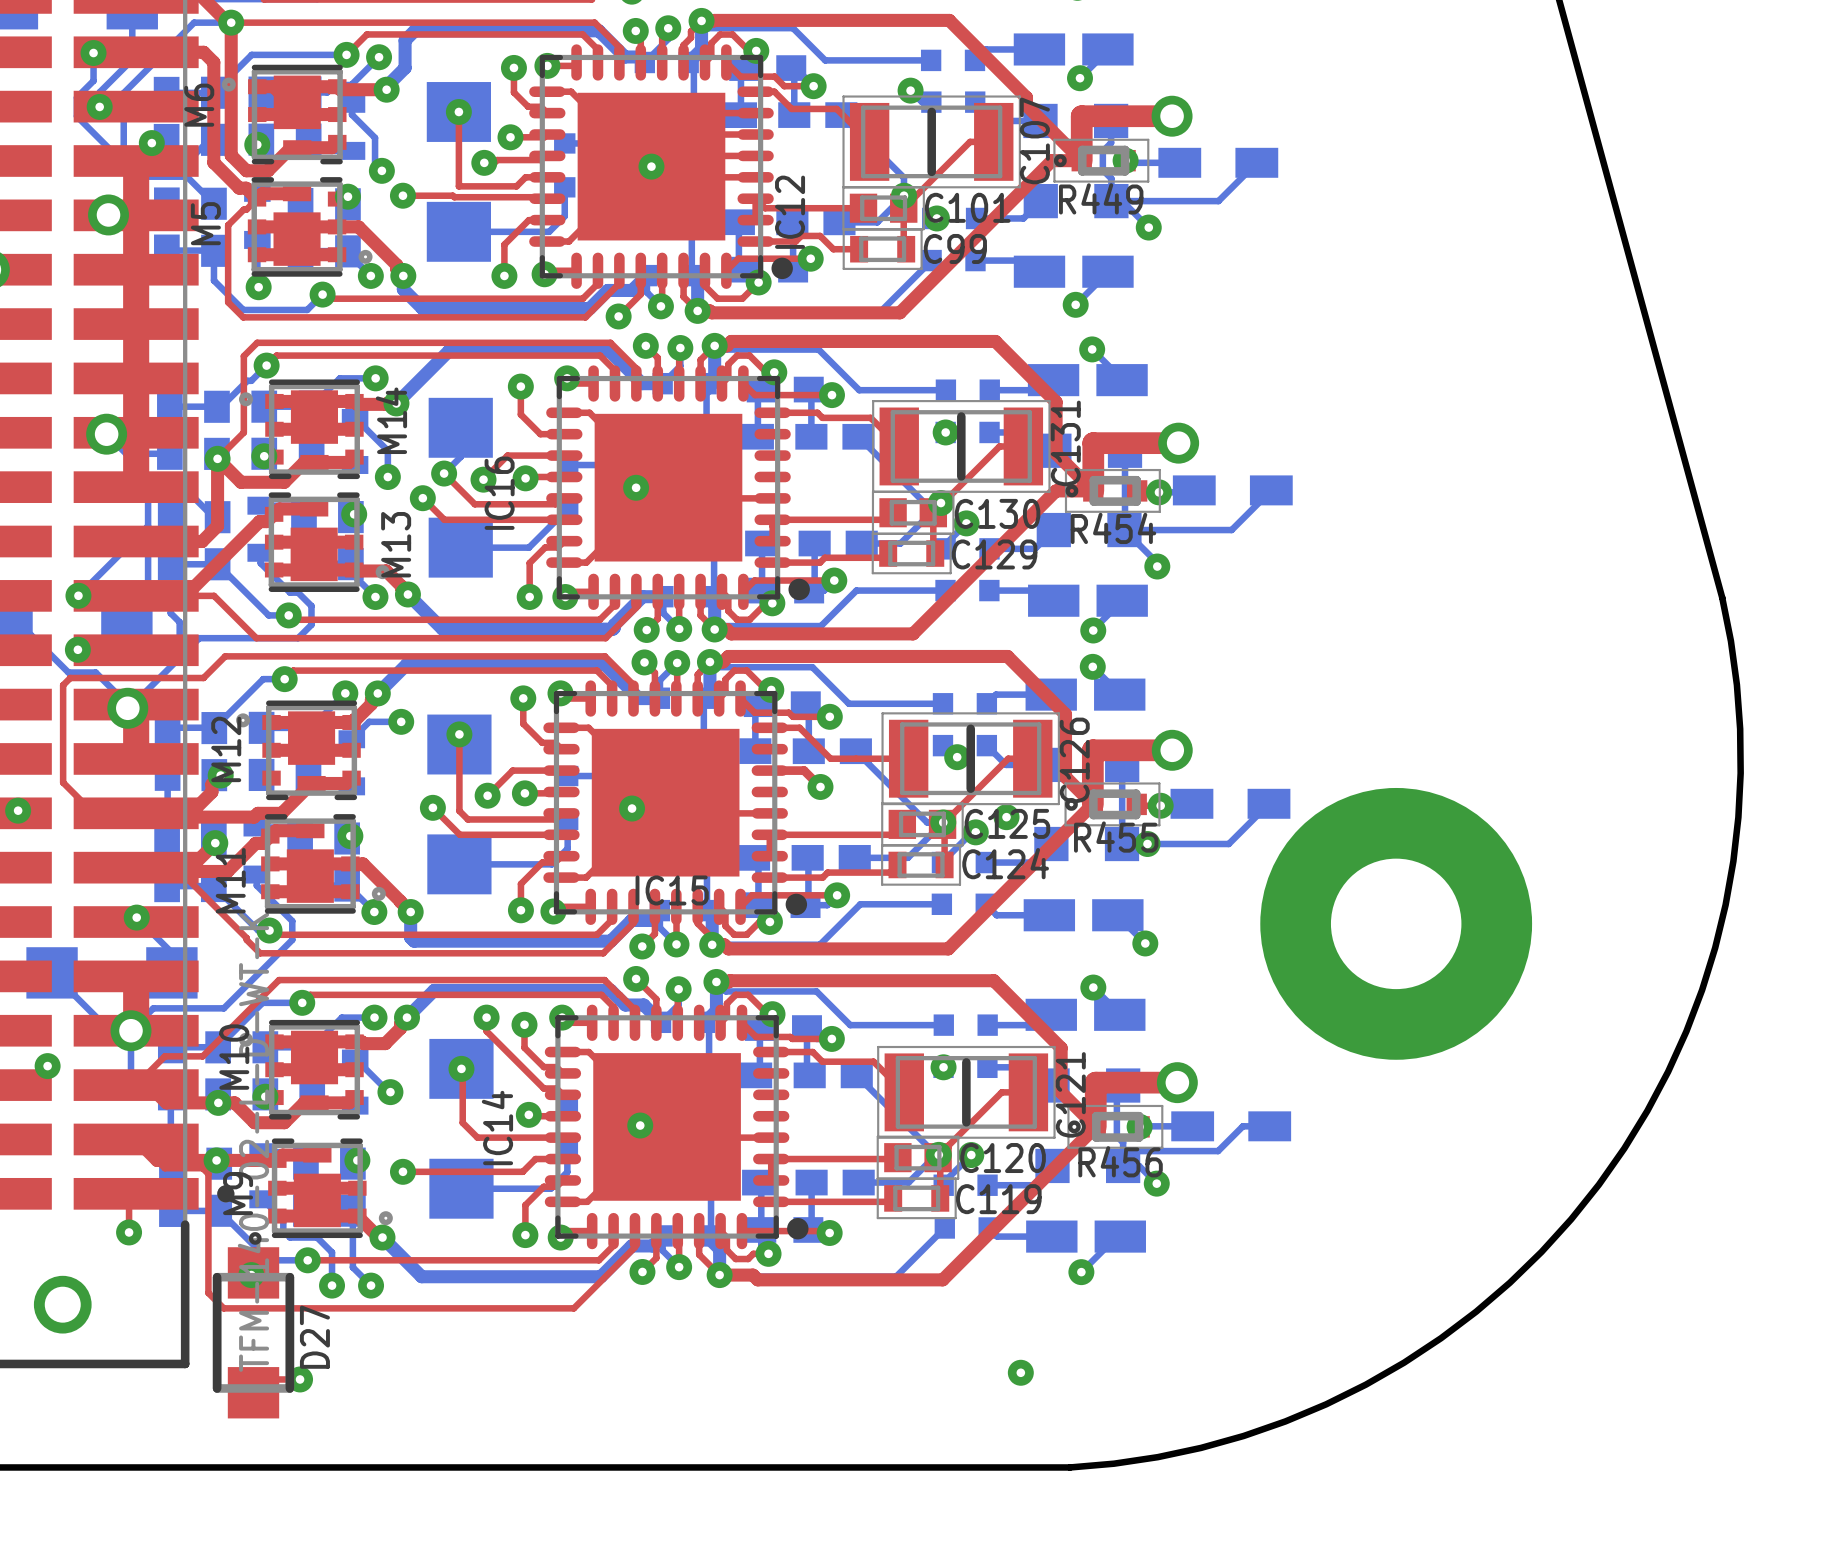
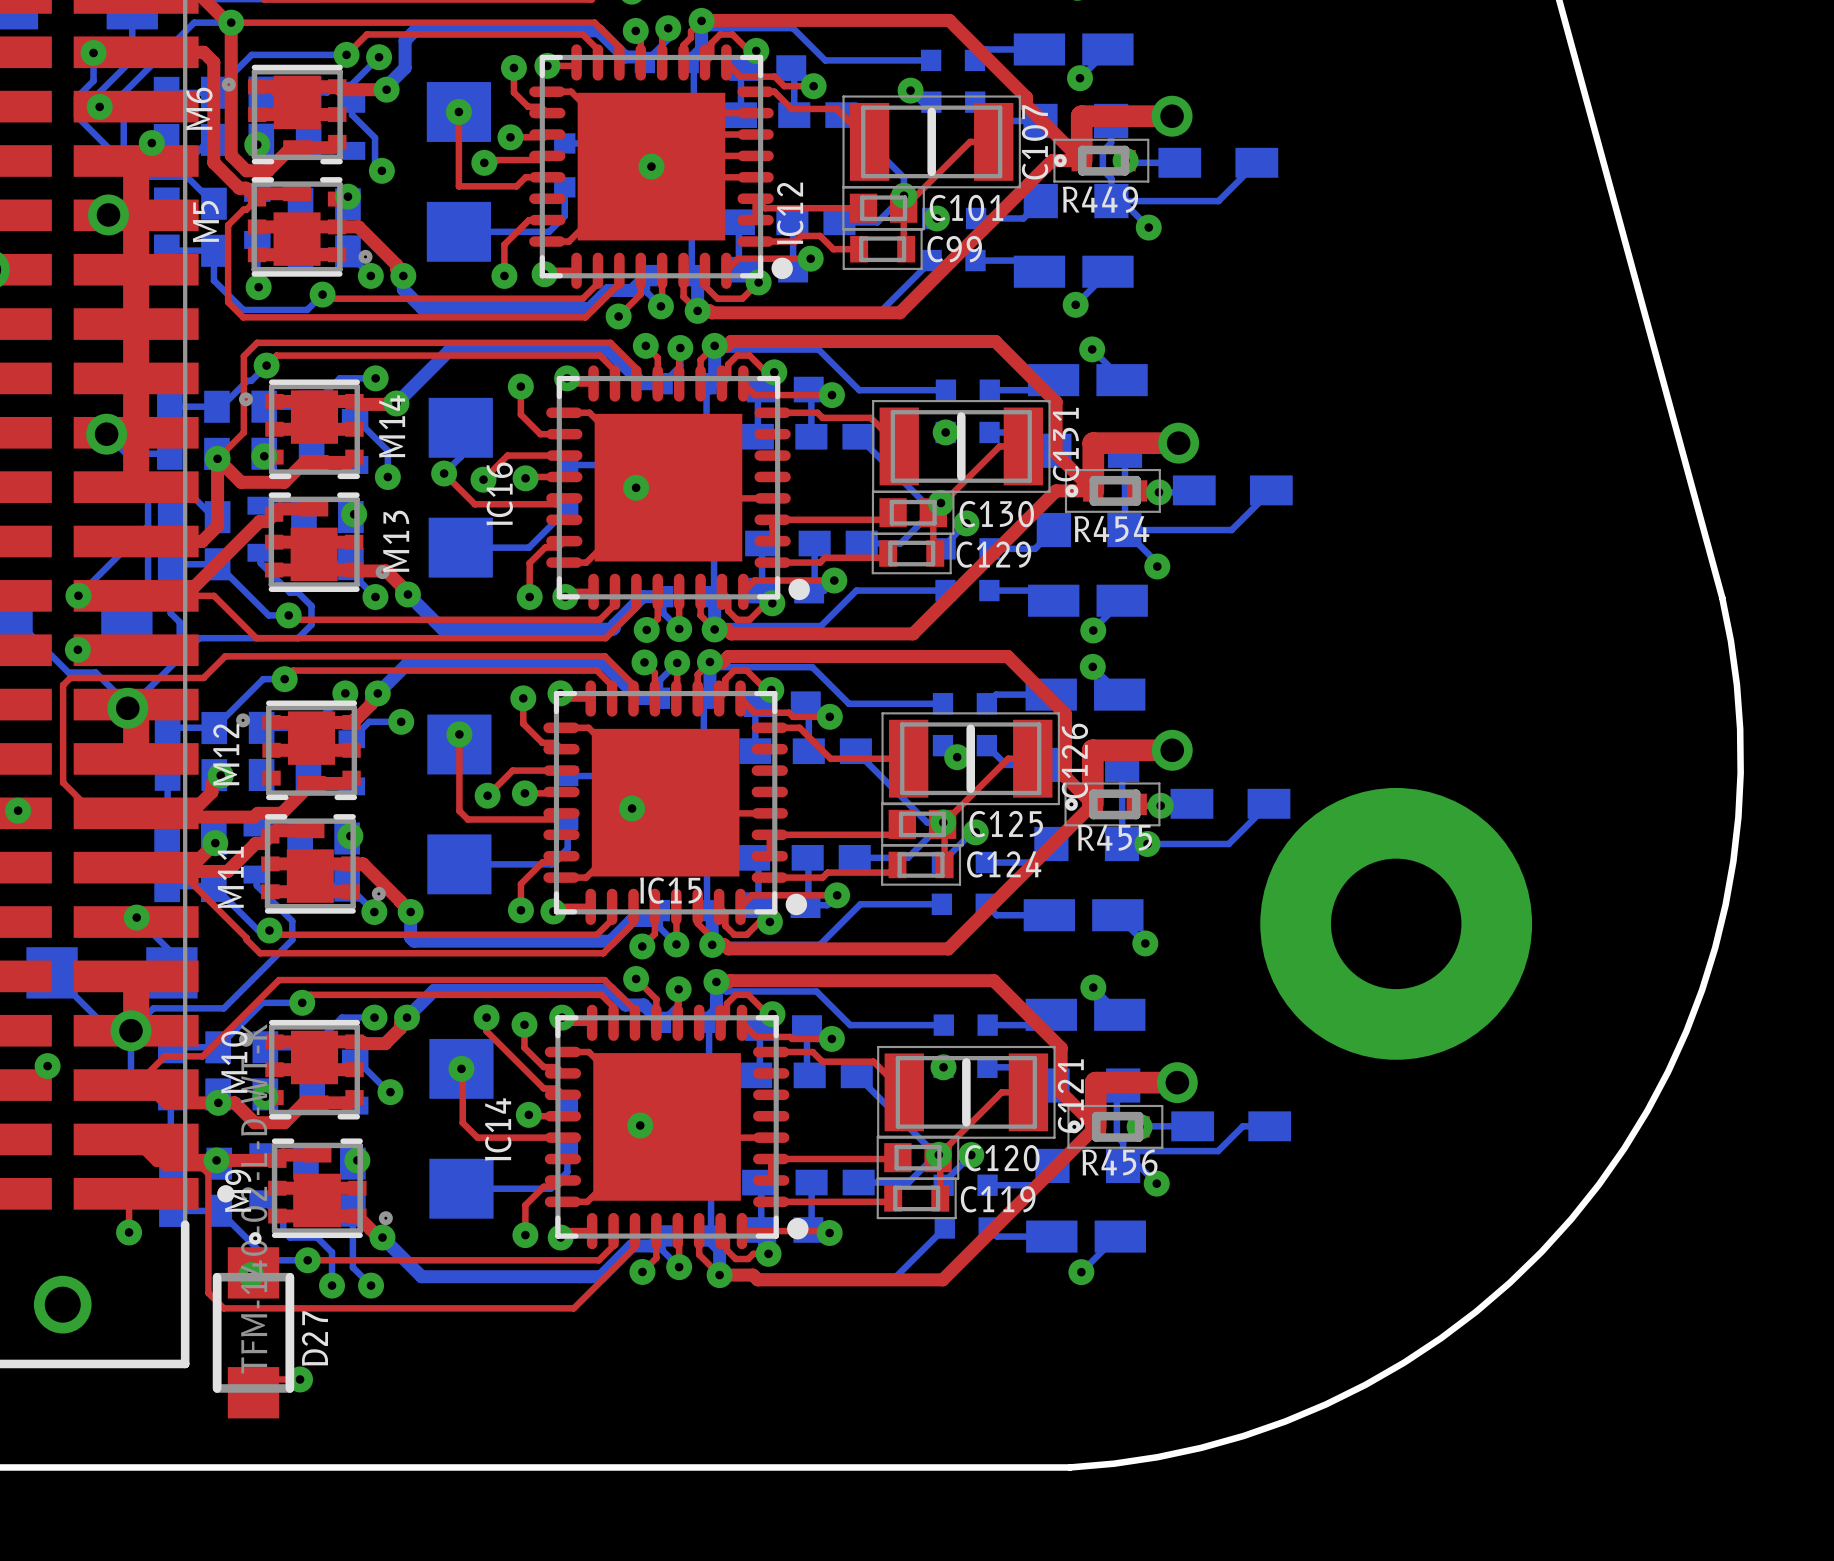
top track: (402, 195) (547, 198) -> none
via: (402, 195) -> none
top track: (422, 498) (444, 519) (564, 519) -> none
via: (422, 498) -> none
top track: (769, 770) (804, 770) (820, 786) -> none
via: (820, 786) -> none
top track: (432, 807) (459, 834) (561, 834) -> none
via: (432, 807) -> none
via: (1006, 817) -> none
top track: (562, 1159) (535, 1159) (522, 1171) (402, 1171) -> none
via: (402, 1171) -> none
via: (1020, 1372) -> none

